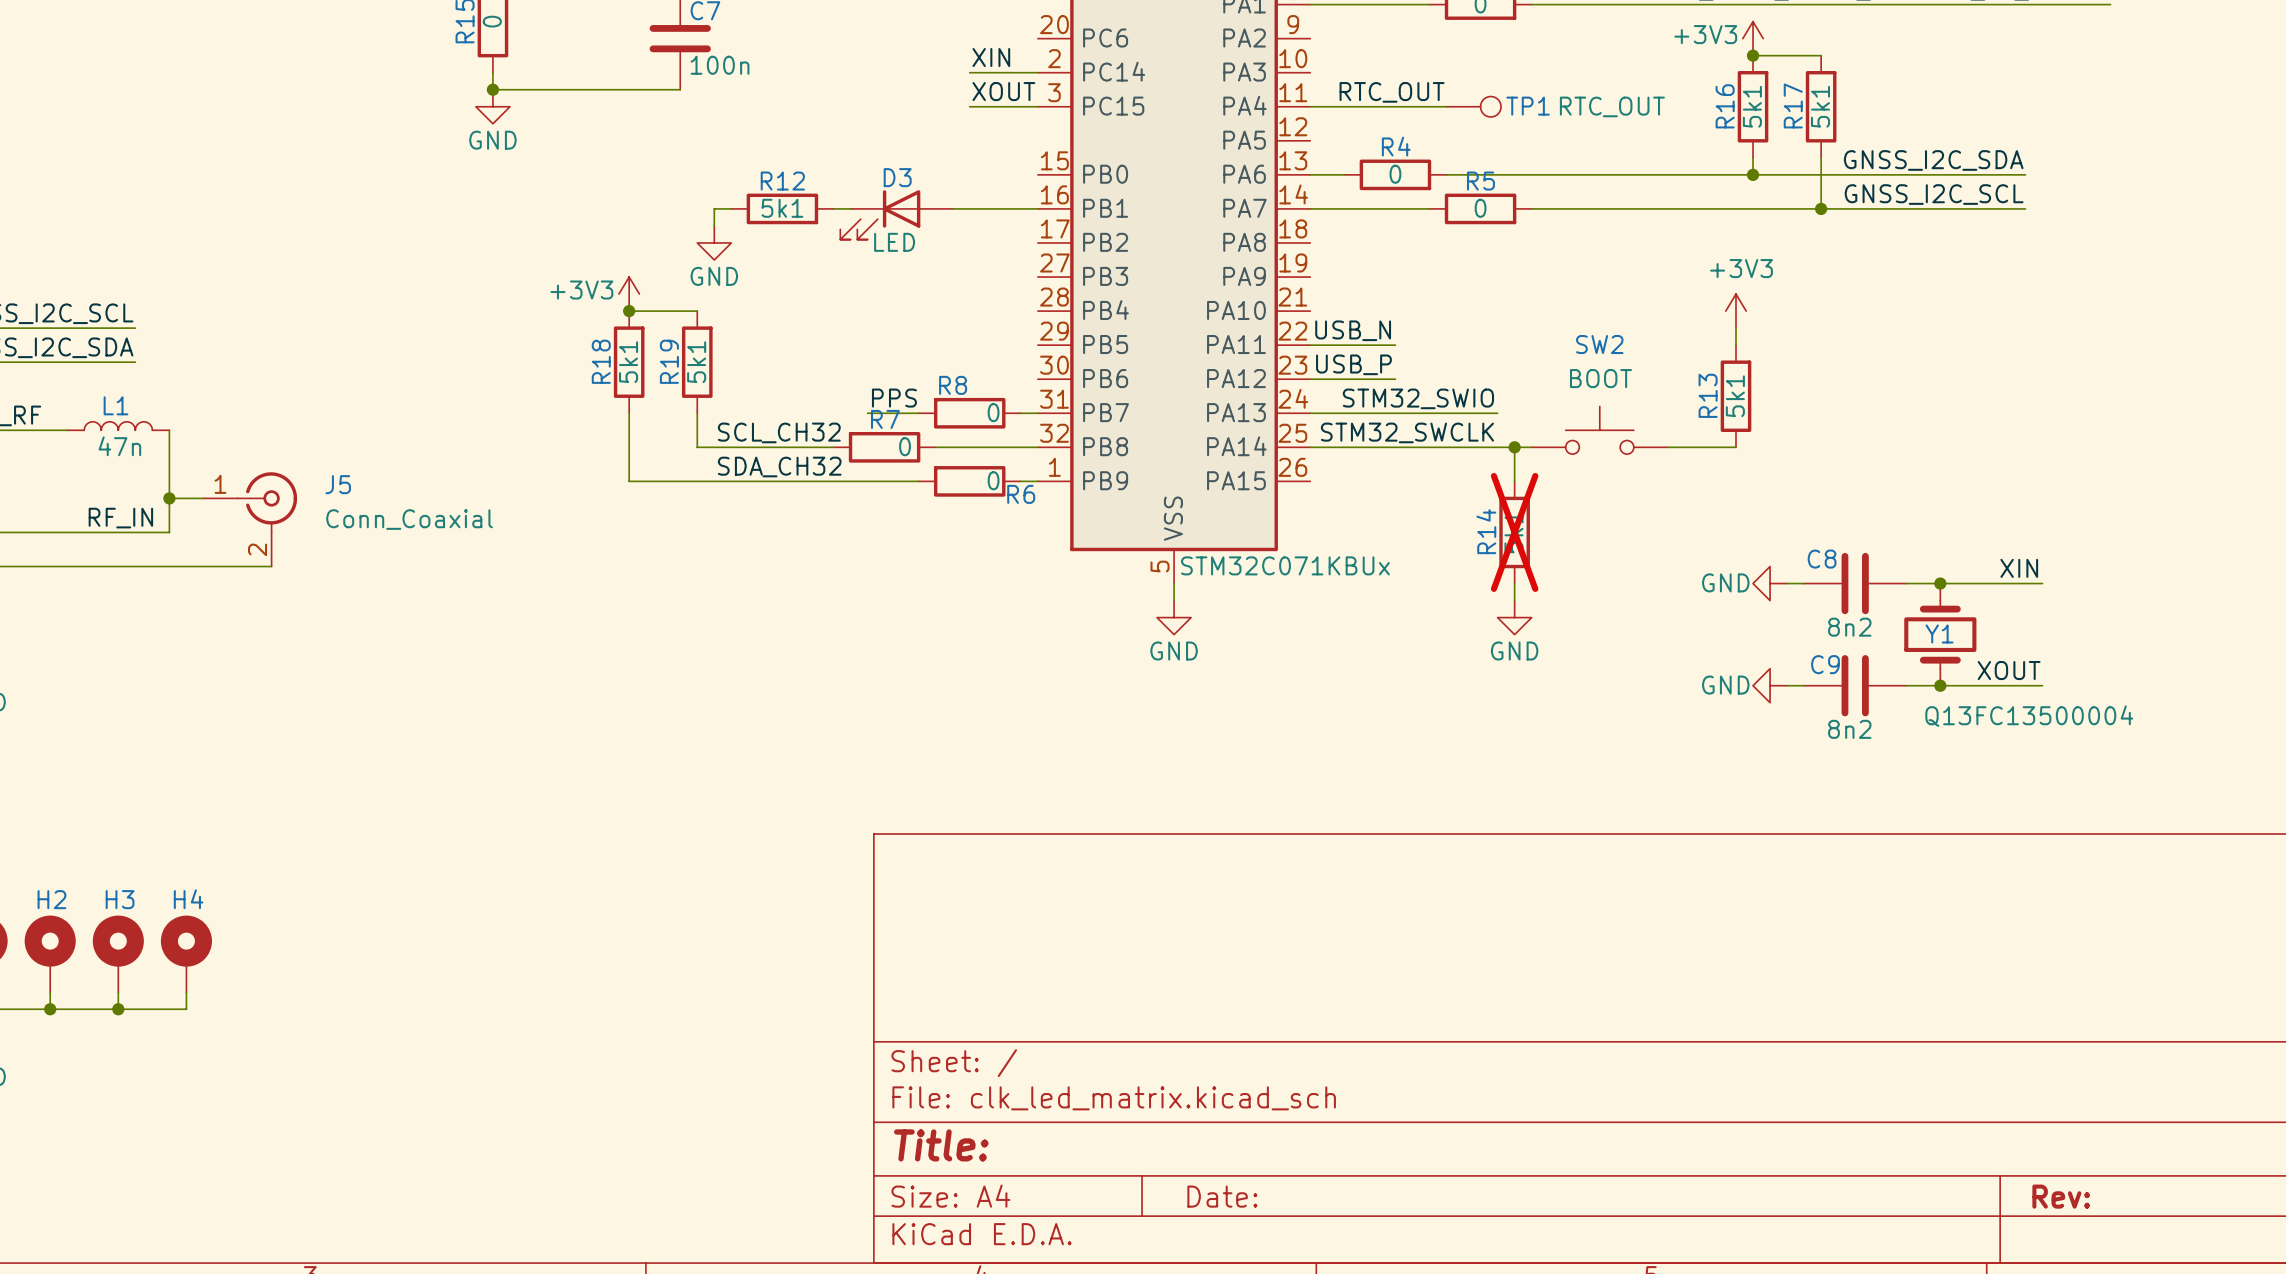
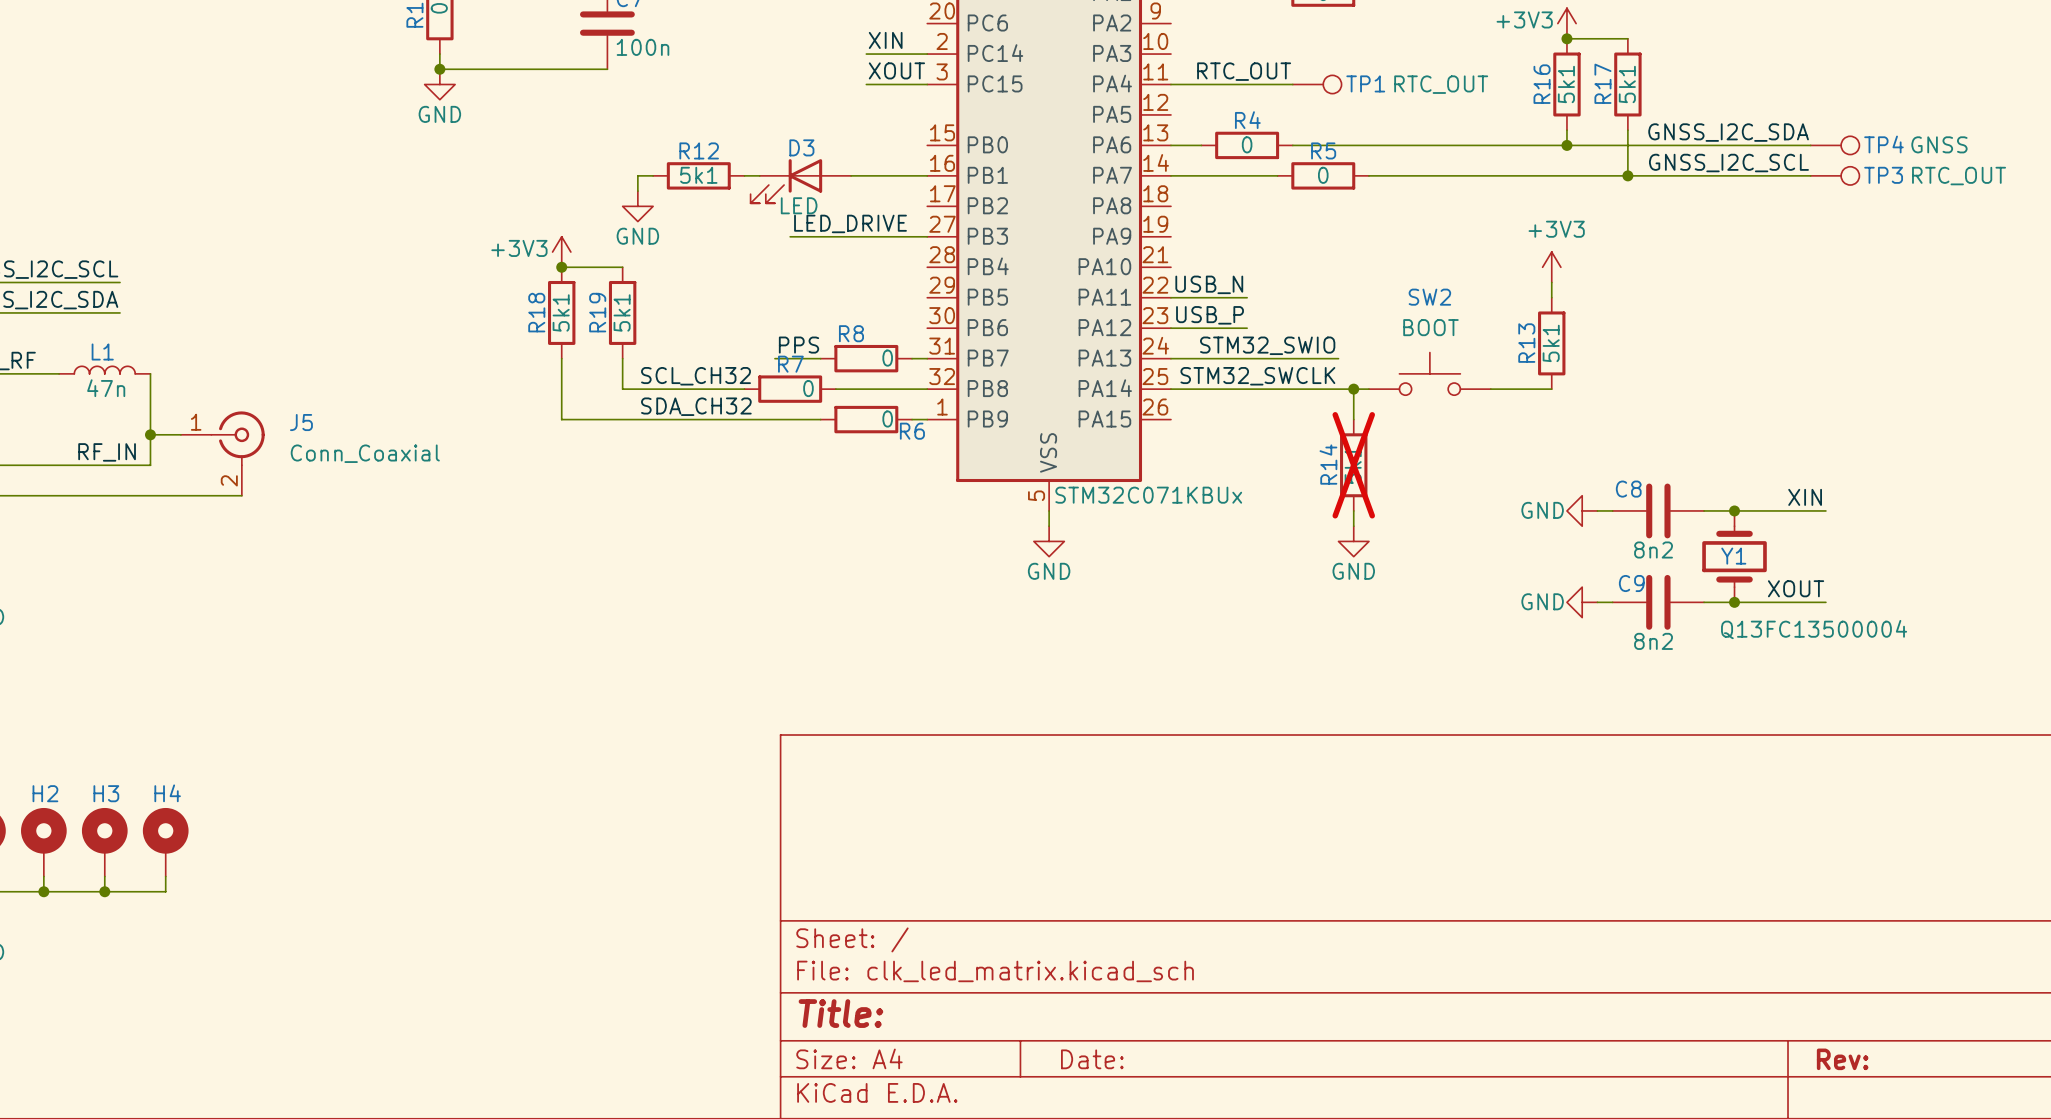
TP4: none -> GNSS (1835, 145)
TP3: none -> RTC_OUT (1835, 175)
label: none -> LED_DRIVE (850, 223)
wire: none -> (790, 236) (927, 236)

